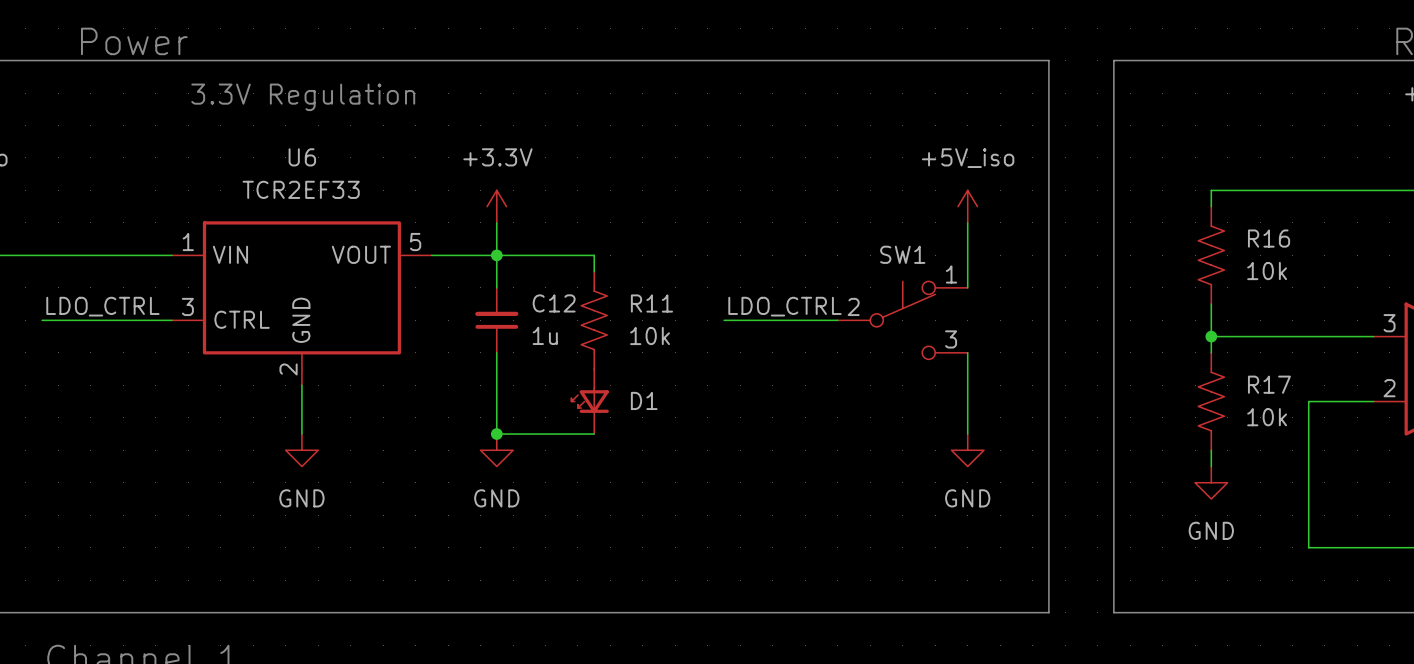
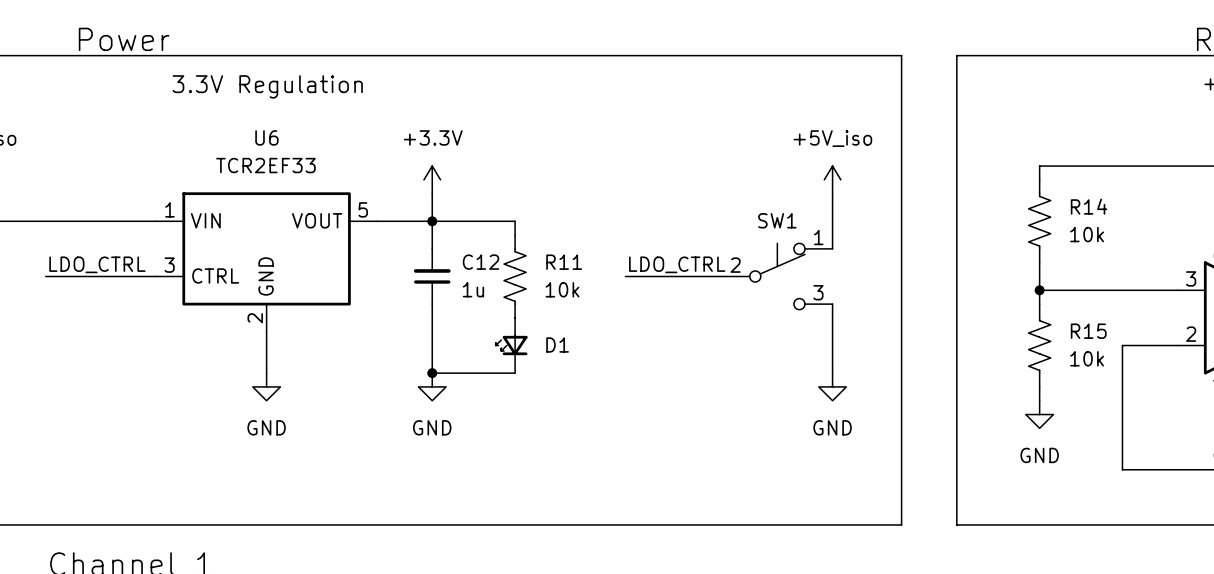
R16 name: R16 (1269, 238) -> R14 (1089, 206)
R17 name: R17 (1269, 384) -> R15 (1088, 331)

